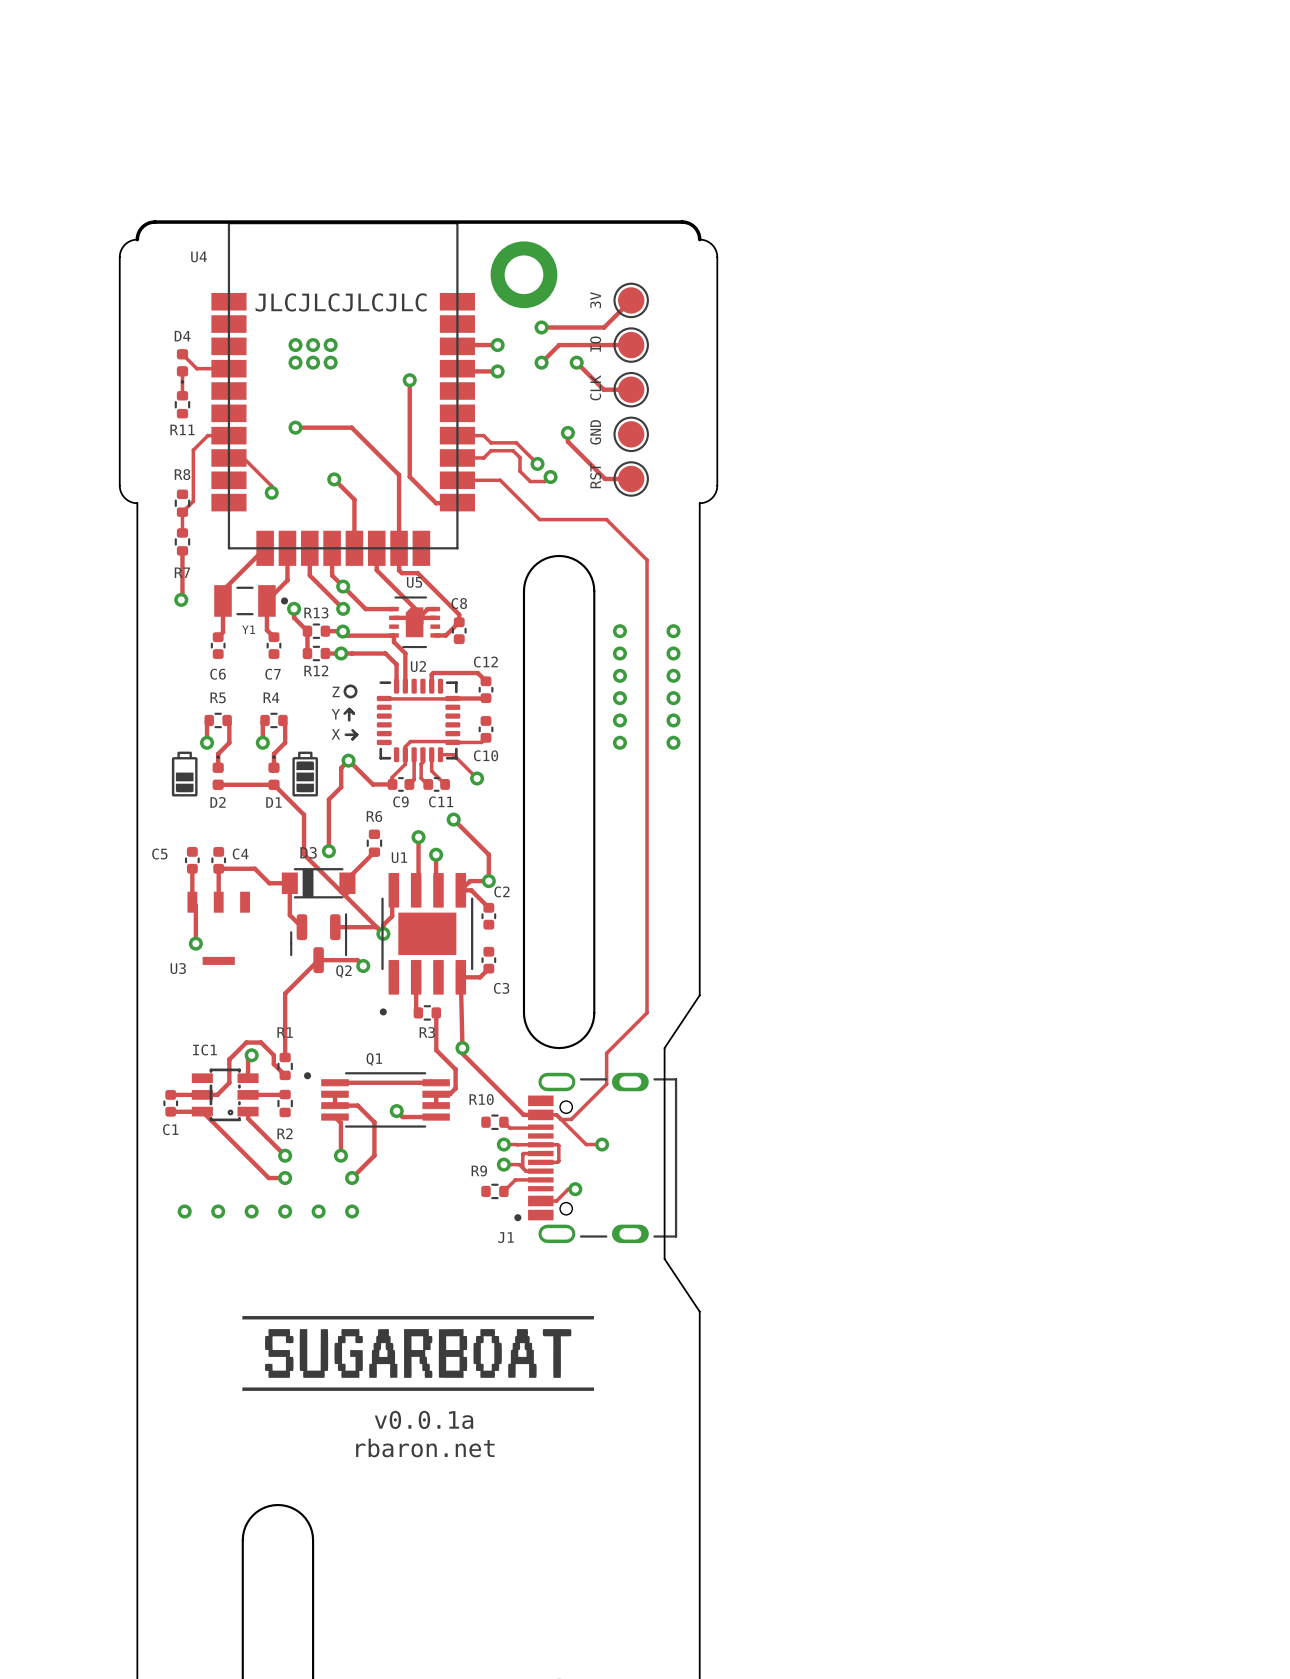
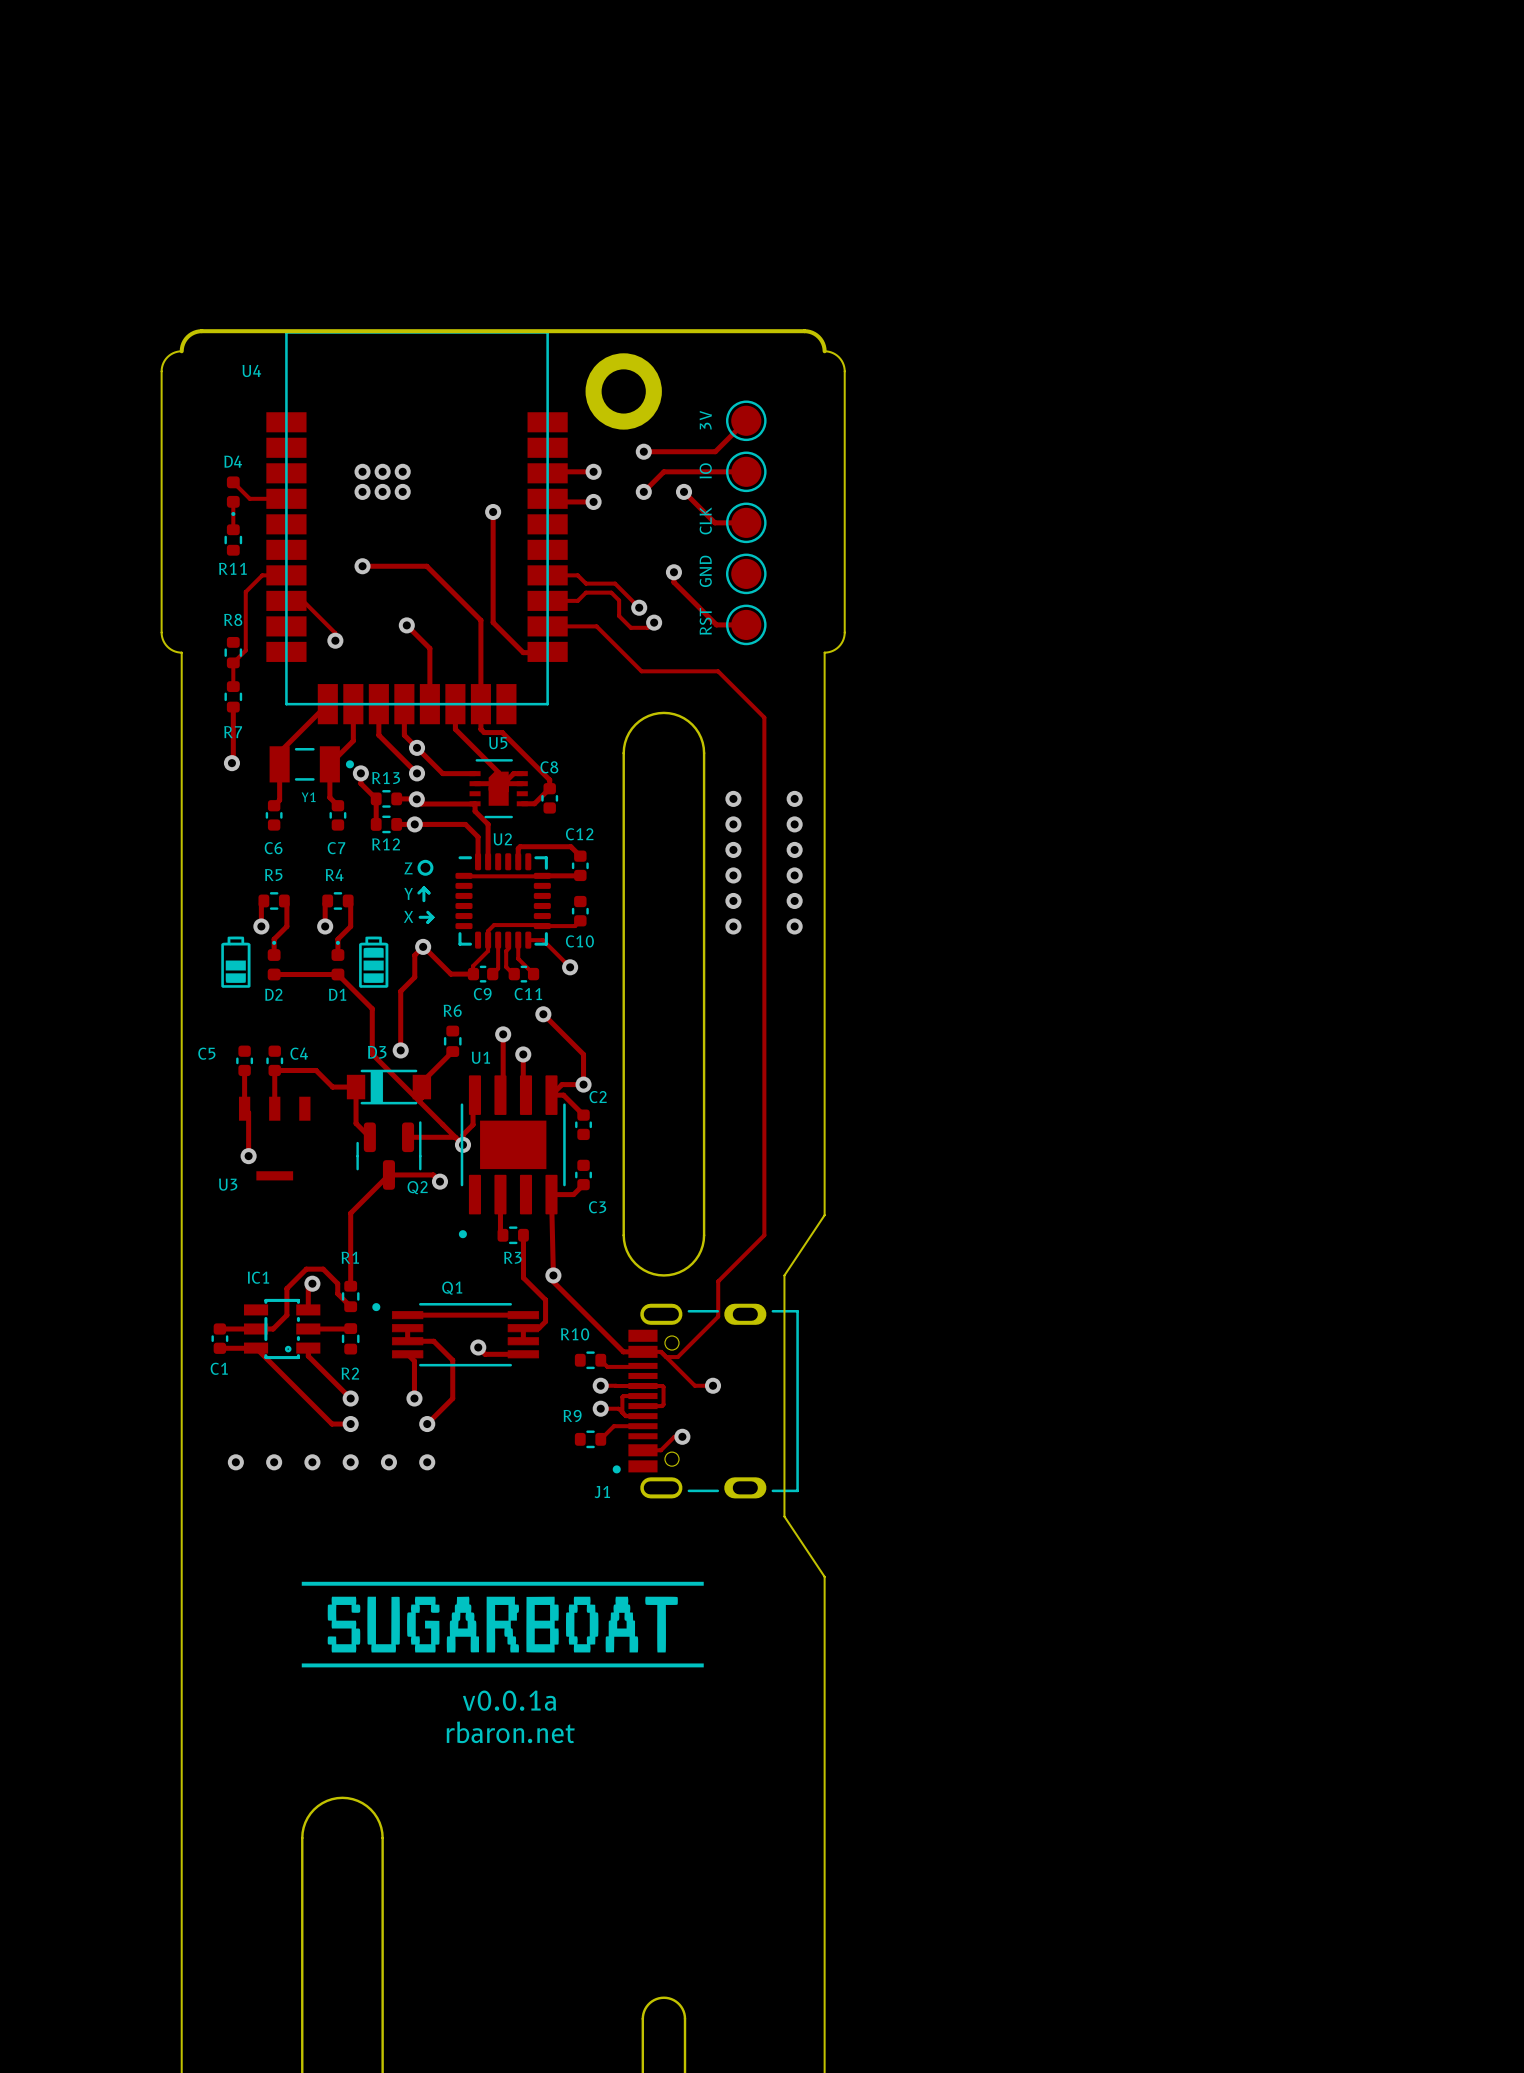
text: JLCJLCJLCJLC (341, 302) -> none

